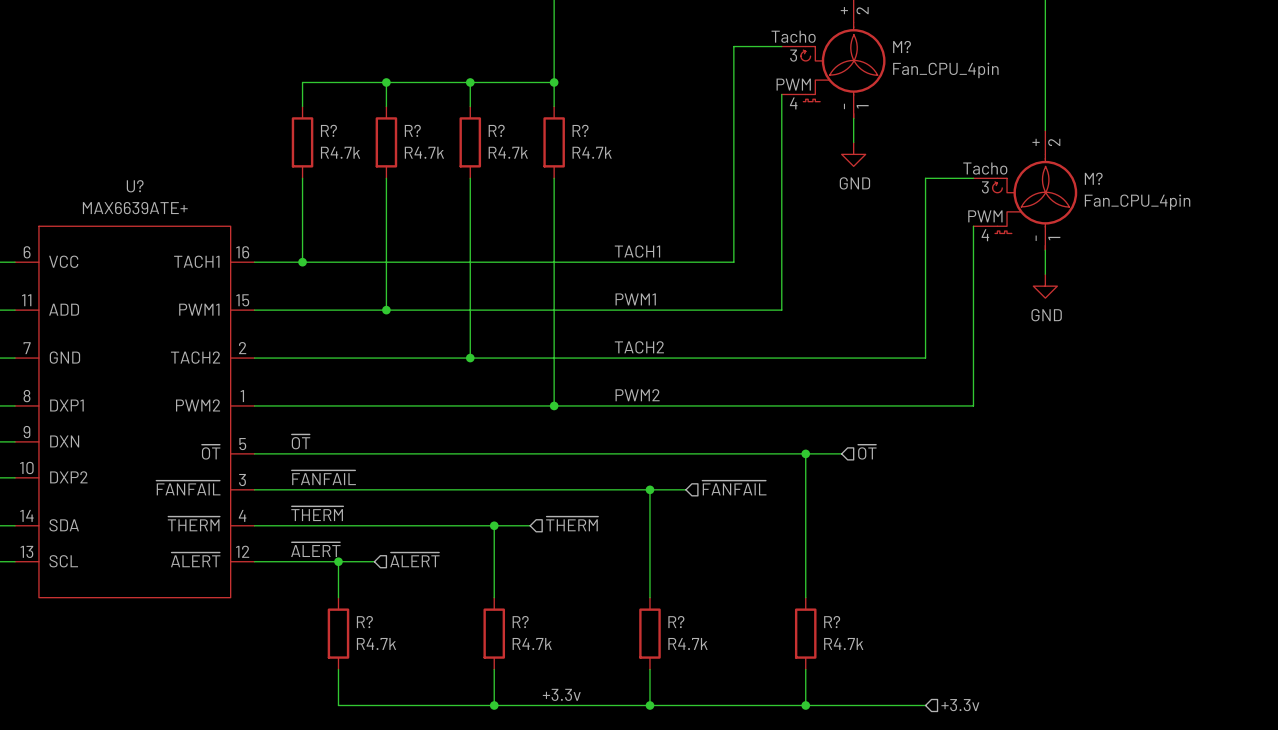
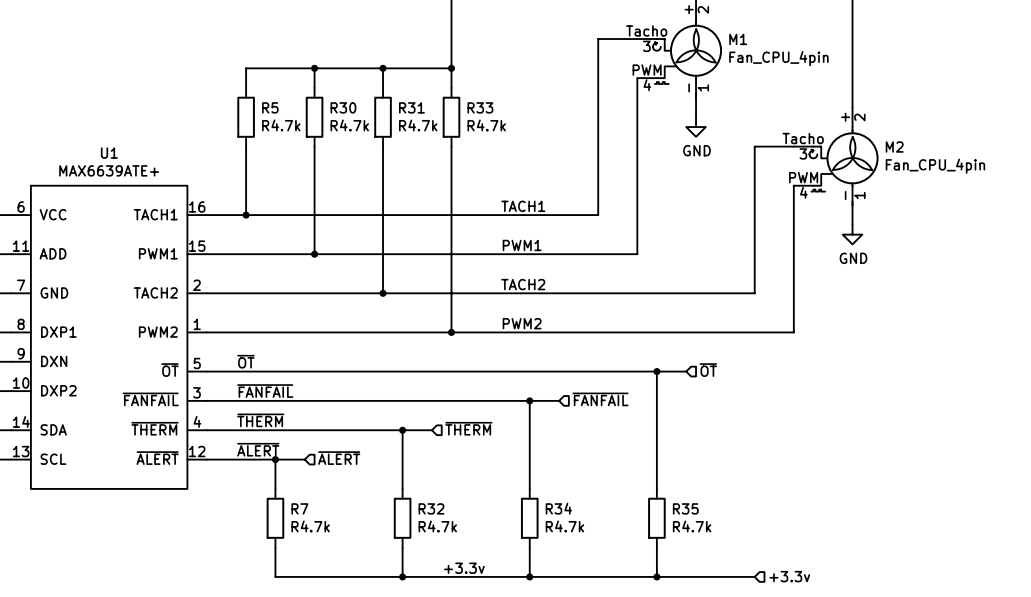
M? name: M? (902, 46) -> M1 (738, 39)
R? name: R? (328, 130) -> R5 (270, 107)
R? name: R? (412, 130) -> R30 (343, 107)
R? name: R? (496, 130) -> R31 (411, 107)
R? name: R? (580, 130) -> R33 (480, 107)
M? name: M? (1093, 178) -> M2 (894, 147)
U? name: U? (135, 186) -> U1 (109, 153)
R? name: R? (364, 622) -> R7 (299, 508)
R? name: R? (520, 622) -> R32 (431, 508)
R? name: R? (676, 622) -> R34 (558, 508)
R? name: R? (832, 622) -> R35 (685, 508)

